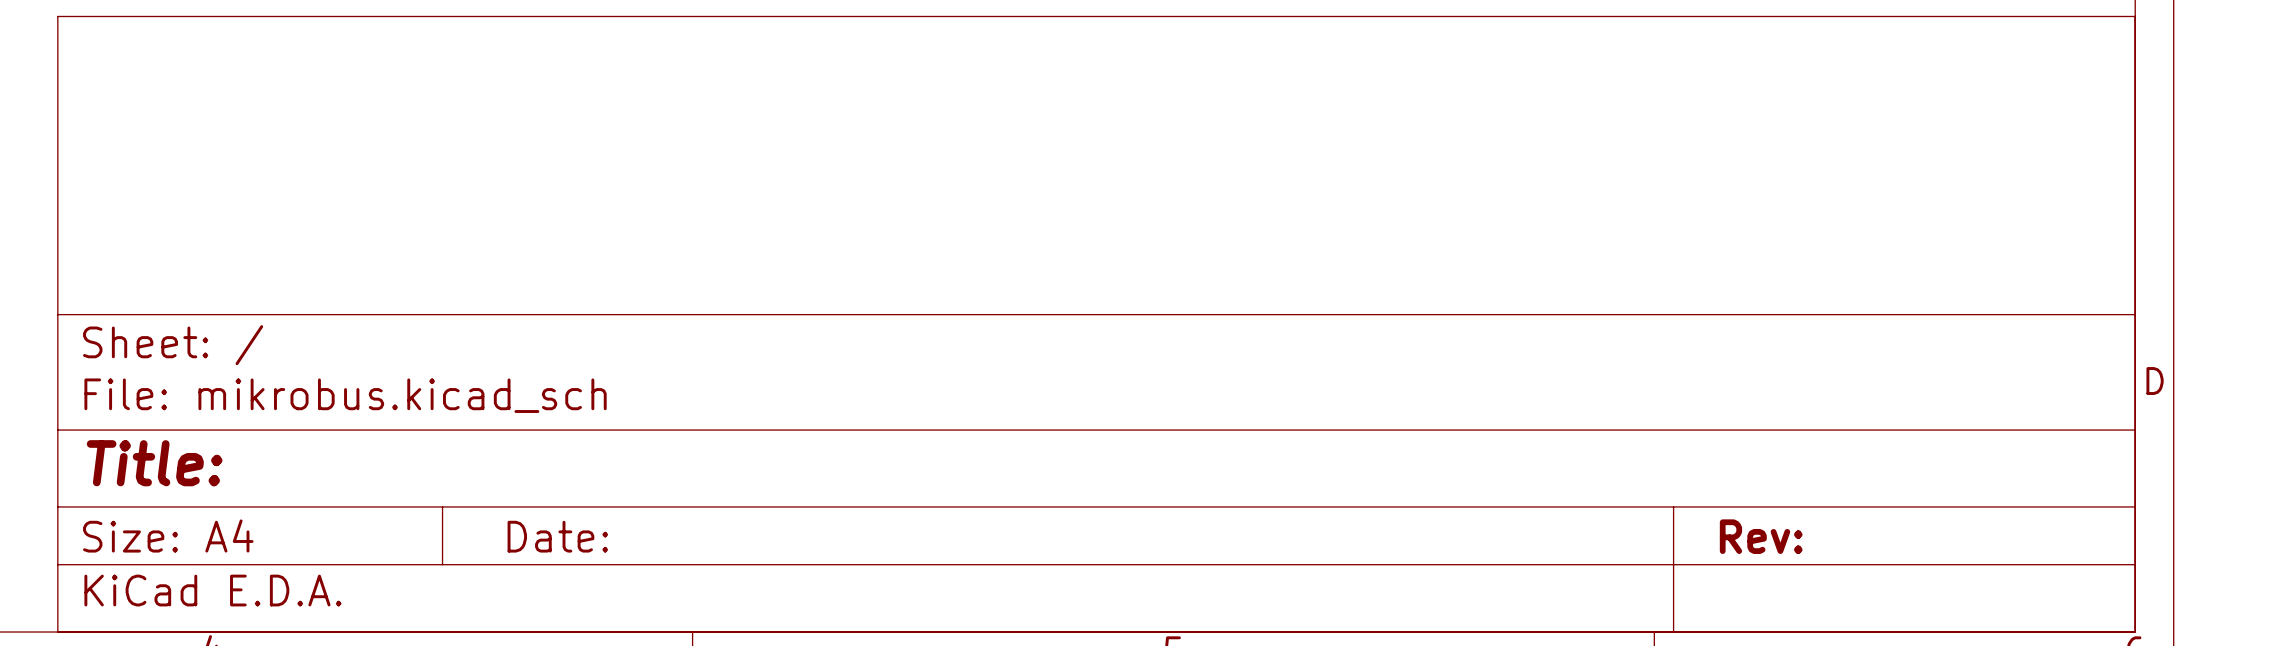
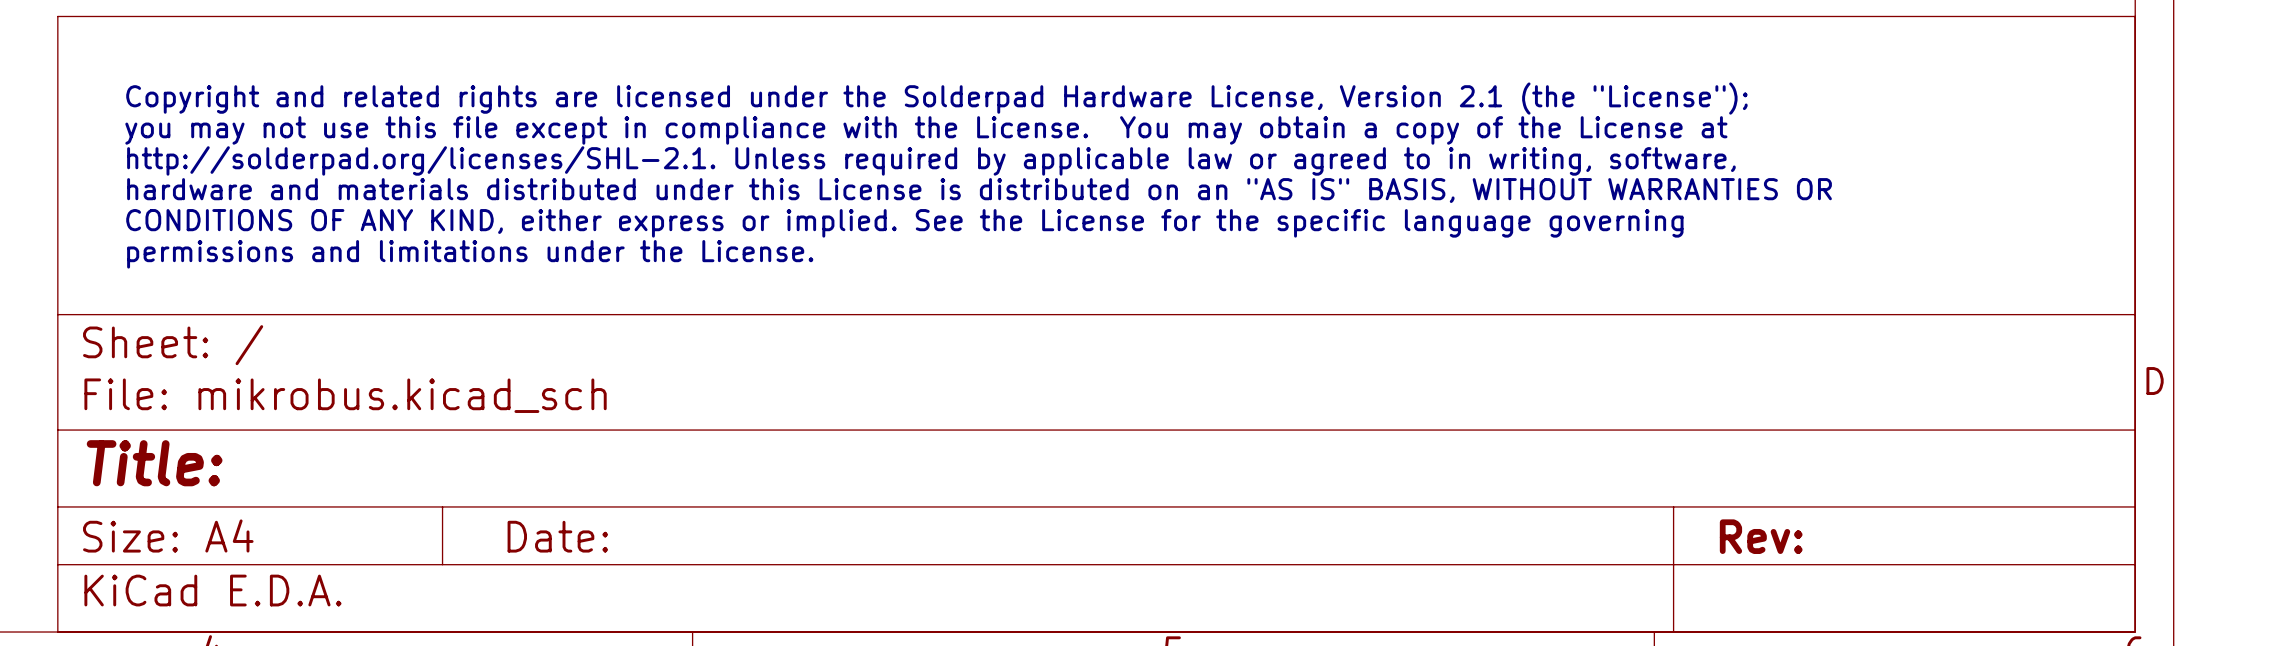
text: none -> Copyright and related rights are licensed under the Solderpad Hardware License, Version 2.1 (the "License"); (936, 98)
text: none -> you may not use this file except in compliance with the License. You may obtain a copy of the License at (926, 130)
text: none -> http://solderpad.org/licenses/SHL-2.1. Unless required by applicable law or agreed to in writing, software, (931, 160)
text: none -> hardware and materials distributed under this License is distributed on an "AS IS" BASIS, WITHOUT WARRANTIES OR (979, 190)
text: none -> CONDITIONS OF ANY KIND, either express or implied. See the License for the specific language governing (904, 223)
text: none -> permissions and limitations under the License. (470, 254)

